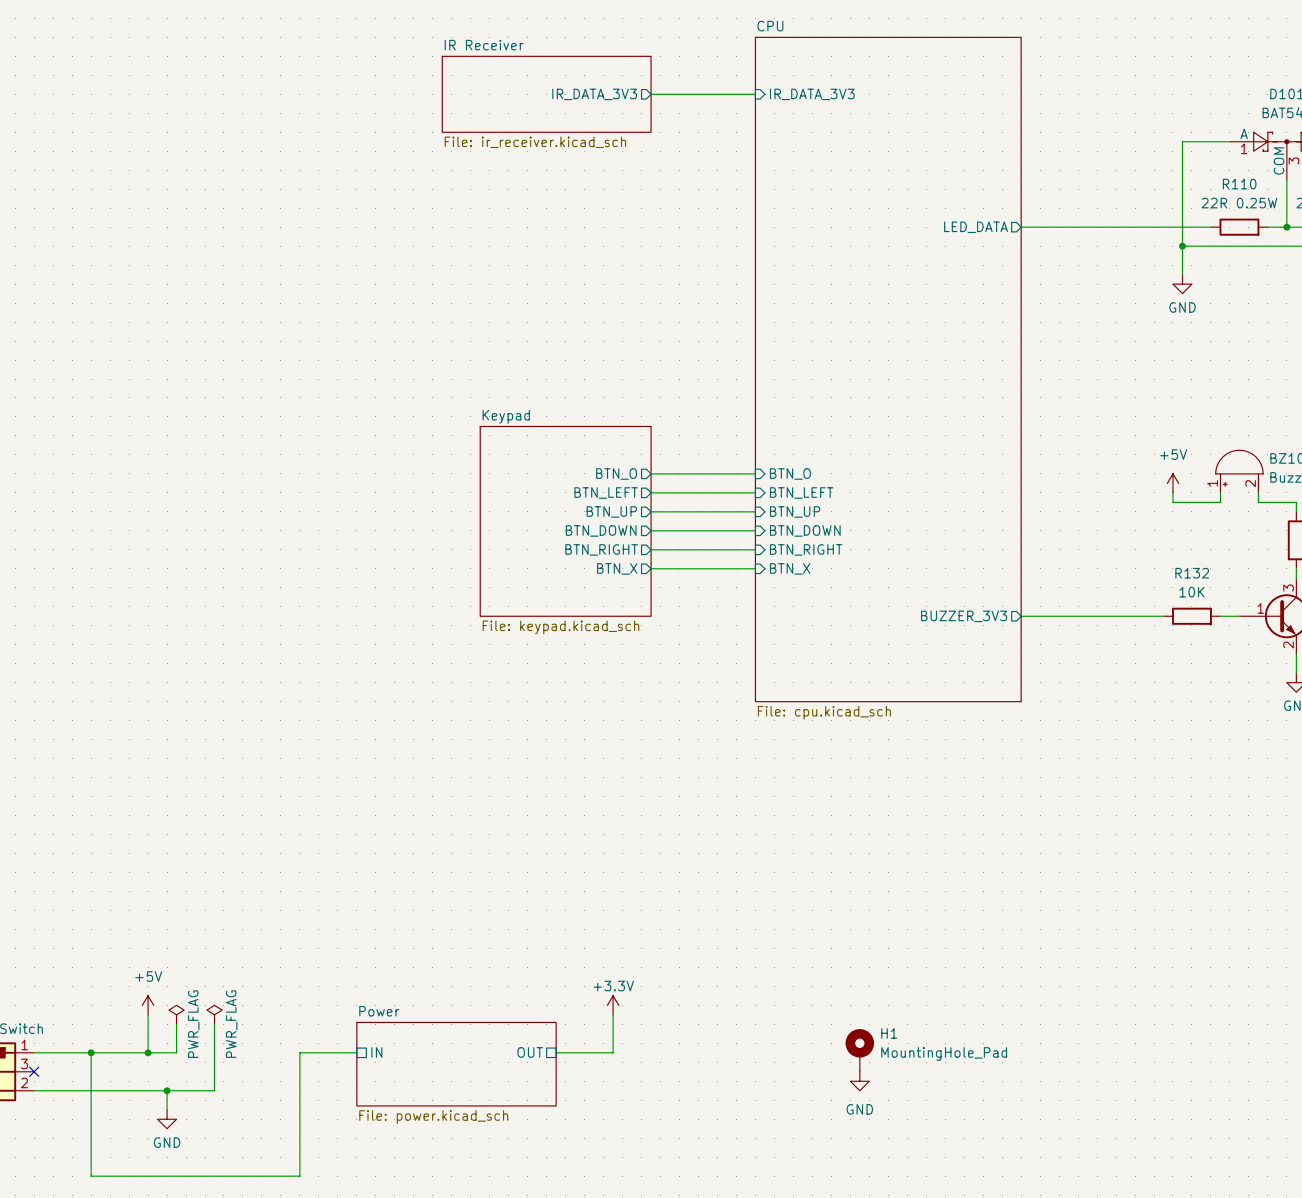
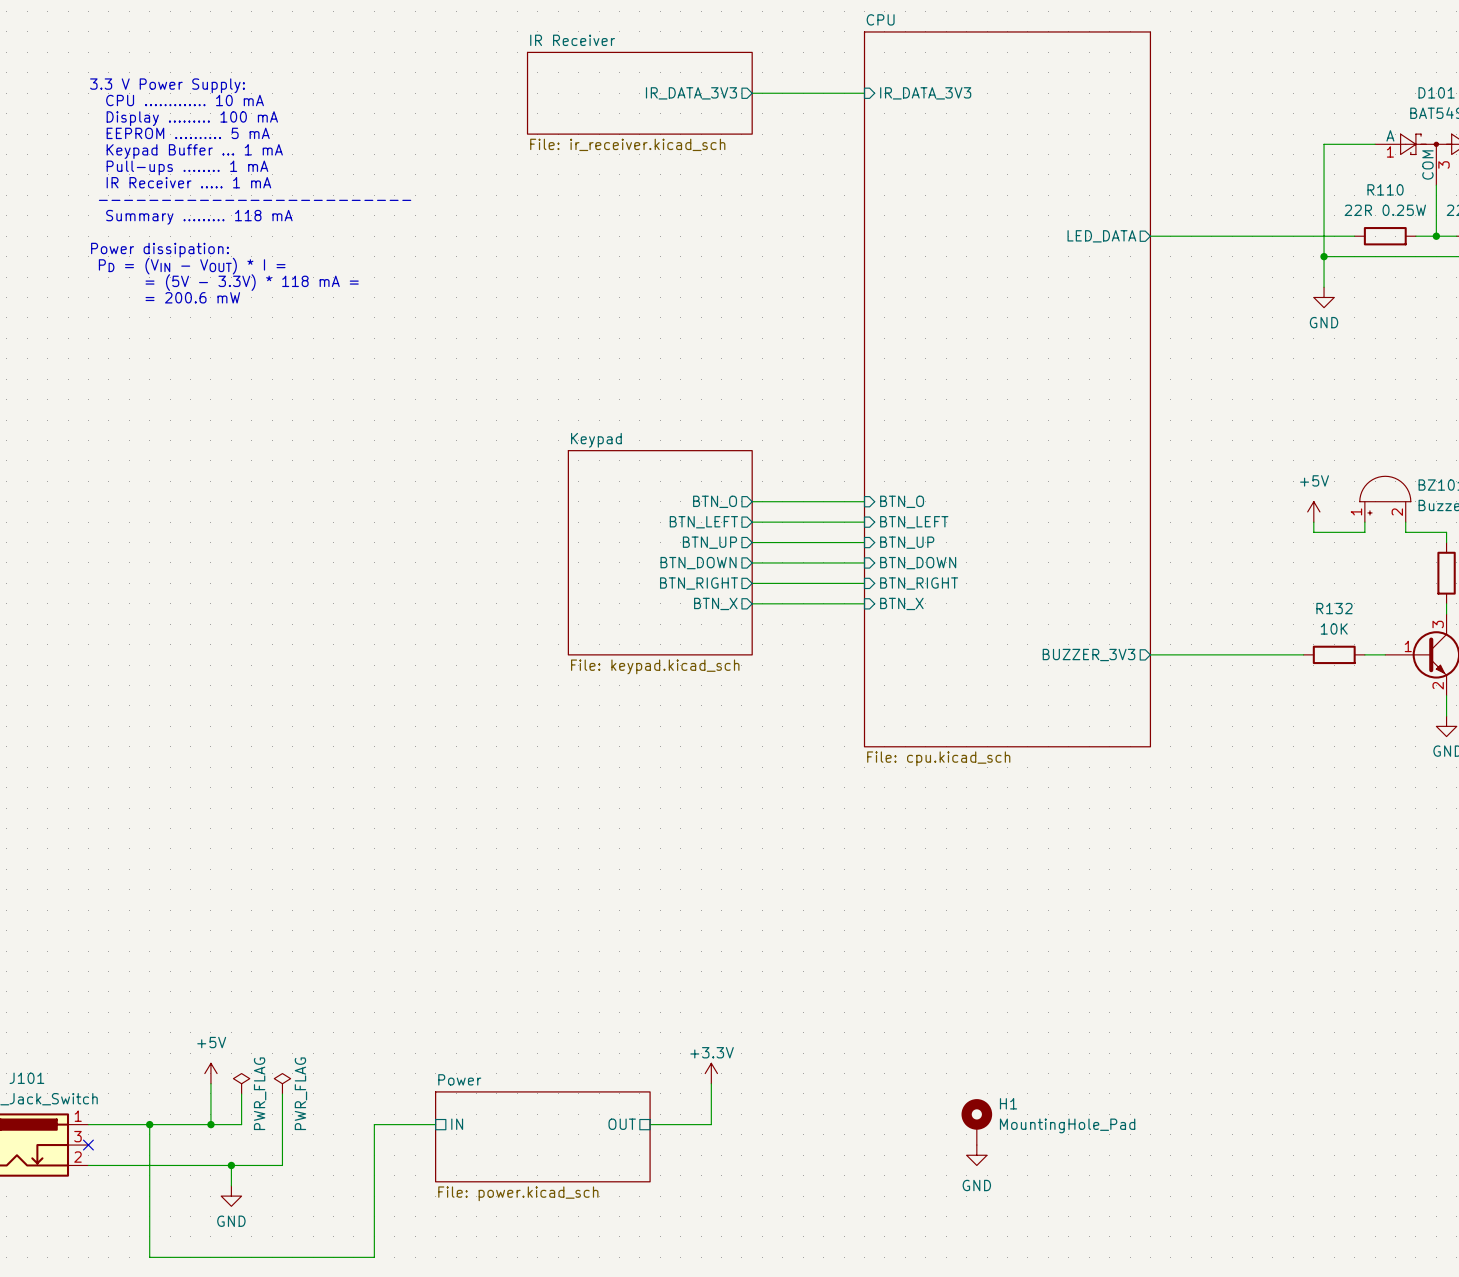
text: none -> 3.3 V Power Supply: (167, 85)
text: none -> CPU ............. 10 mA (185, 100)
text: none -> Display ......... 100 mA (192, 118)
text: none -> EEPROM .......... 5 mA (188, 133)
text: none -> Keypad Buffer ... 1 mA (194, 151)
text: none -> Pull-ups ........ 1 mA (187, 167)
text: none -> IR Receiver ..... 1 mA (188, 182)
text: none -> ------------------------- (255, 200)
text: none -> Summary ......... 118 mA (199, 217)
text: none -> Power dissipation: (159, 250)
text: none -> PD = (VIN - VOUT) * I = (192, 266)
text: none -> = (5V - 3.3V) * 118 mA = (252, 282)
text: none -> = 200.6 mW (192, 297)

